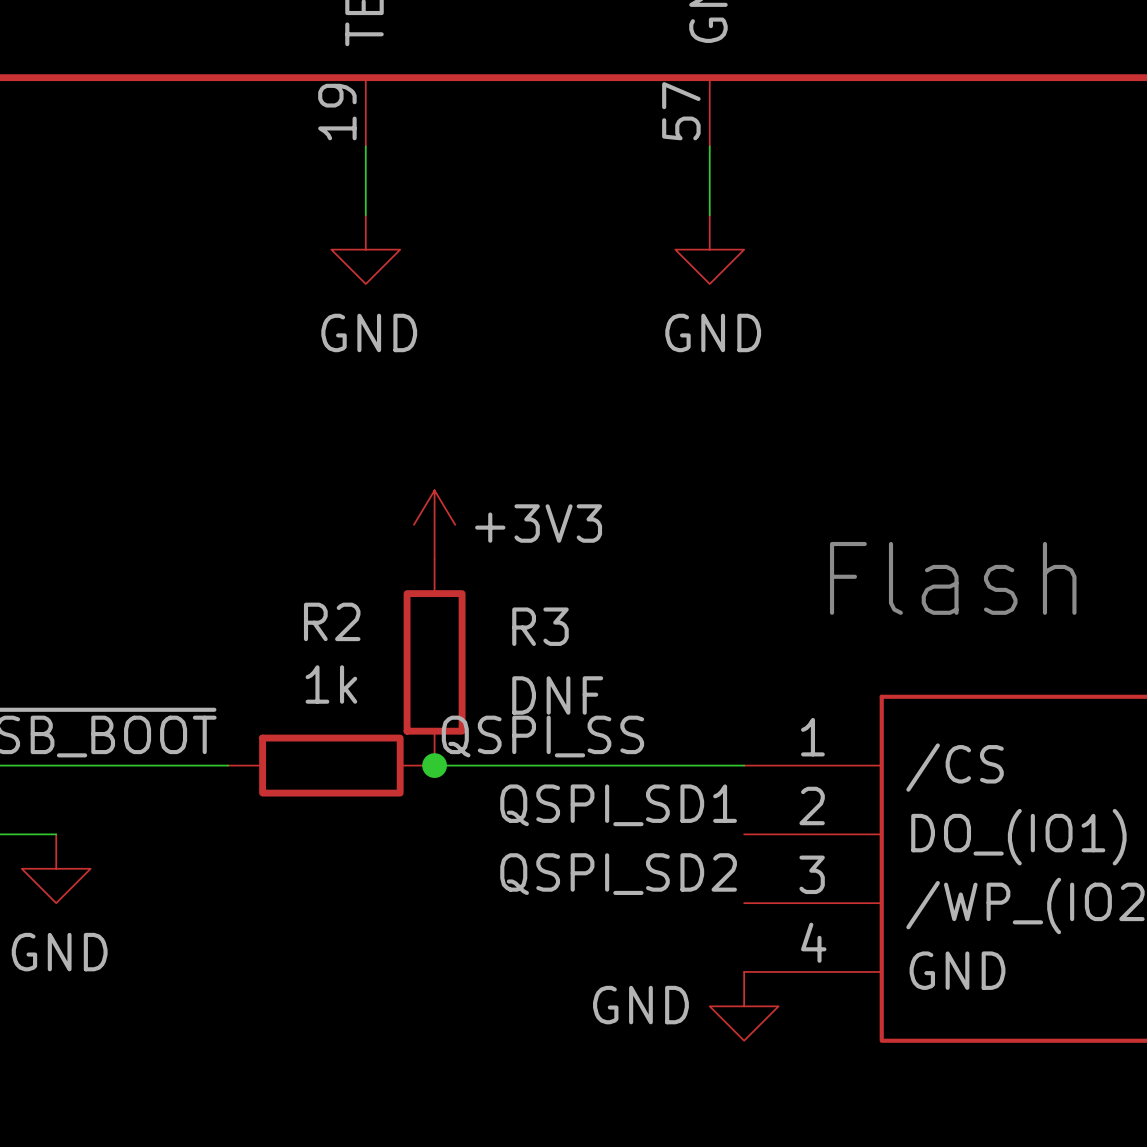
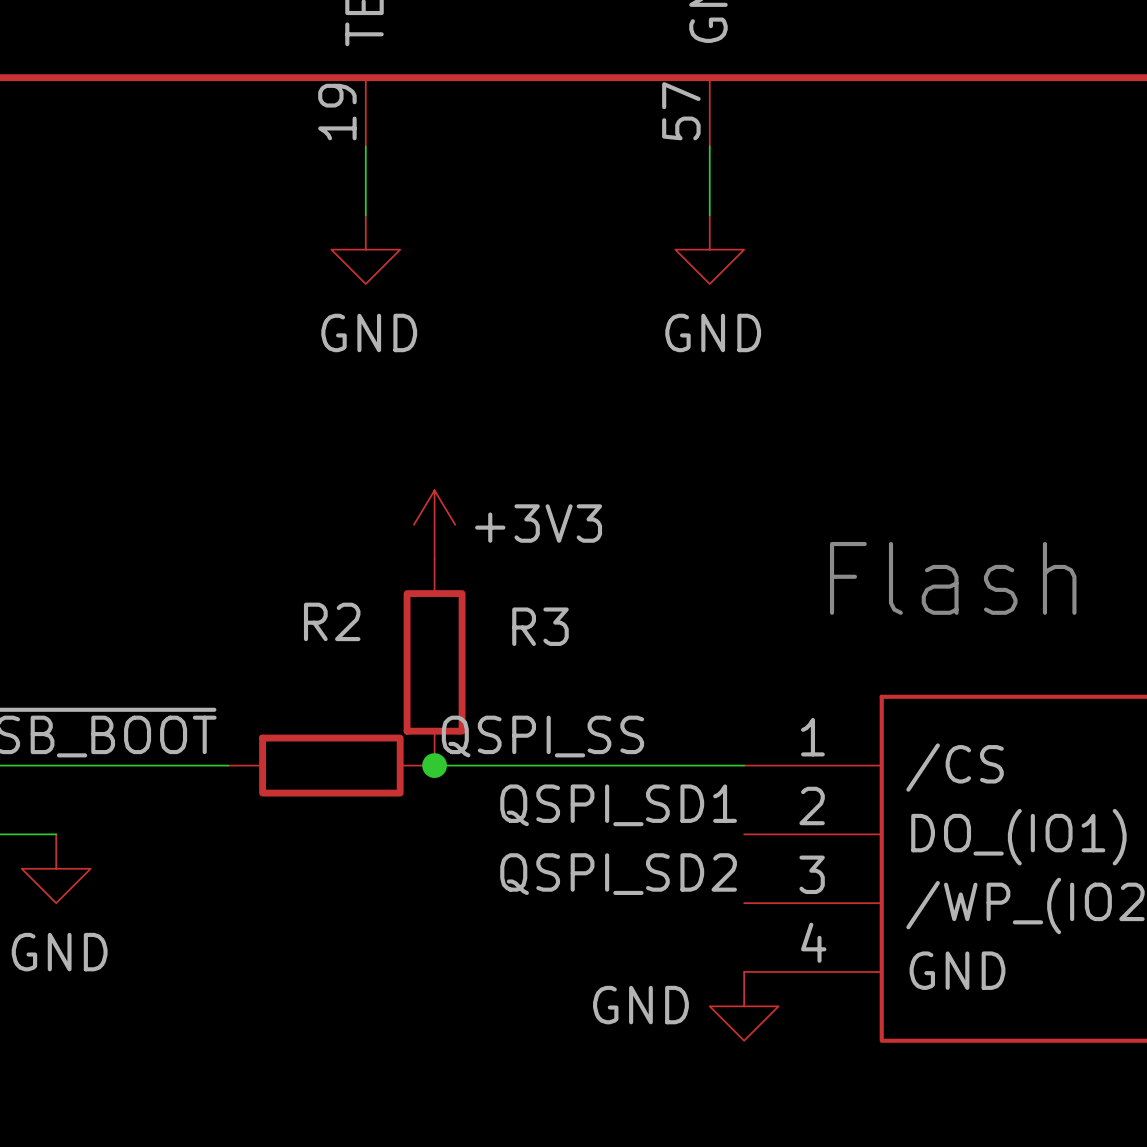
R2 value: 1k (331, 684) -> none
R3 value: DNF (557, 695) -> none

